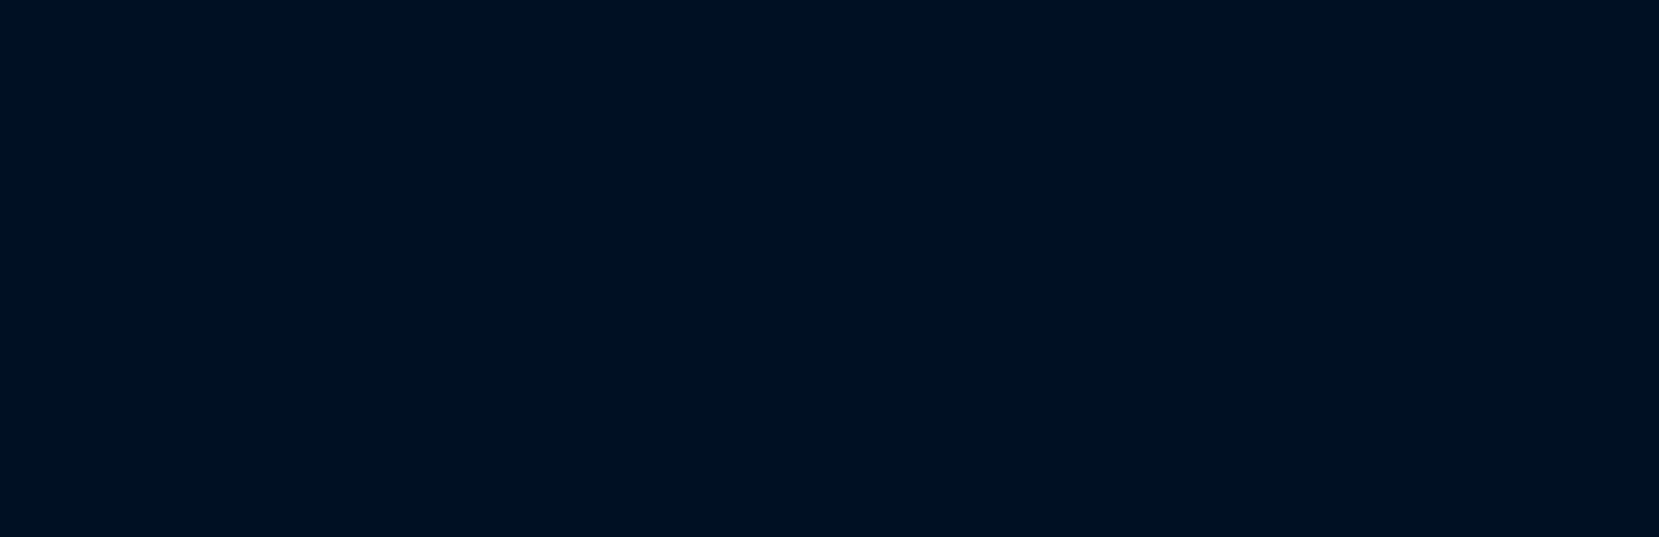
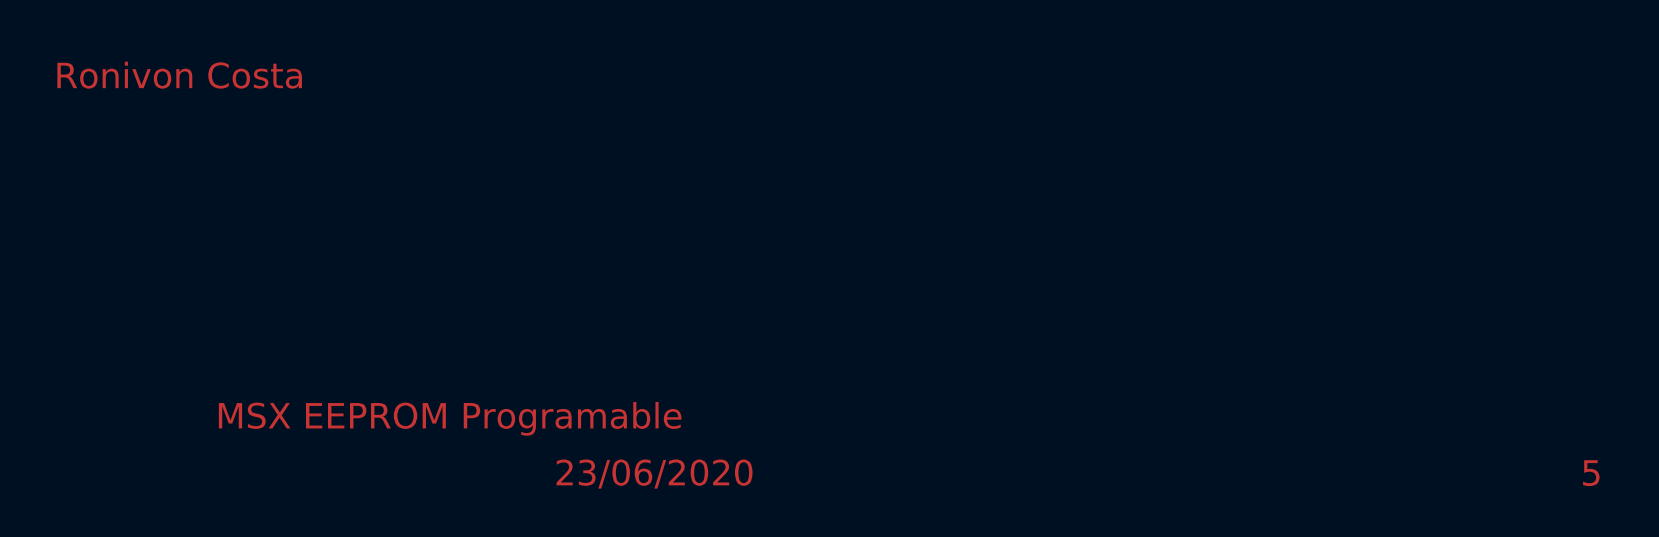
text: none -> Ronivon Costa (179, 75)
text: none -> MSX EEPROM Programable (450, 418)
text: none -> 5 (1591, 473)
text: none -> 23/06/2020 (654, 474)

